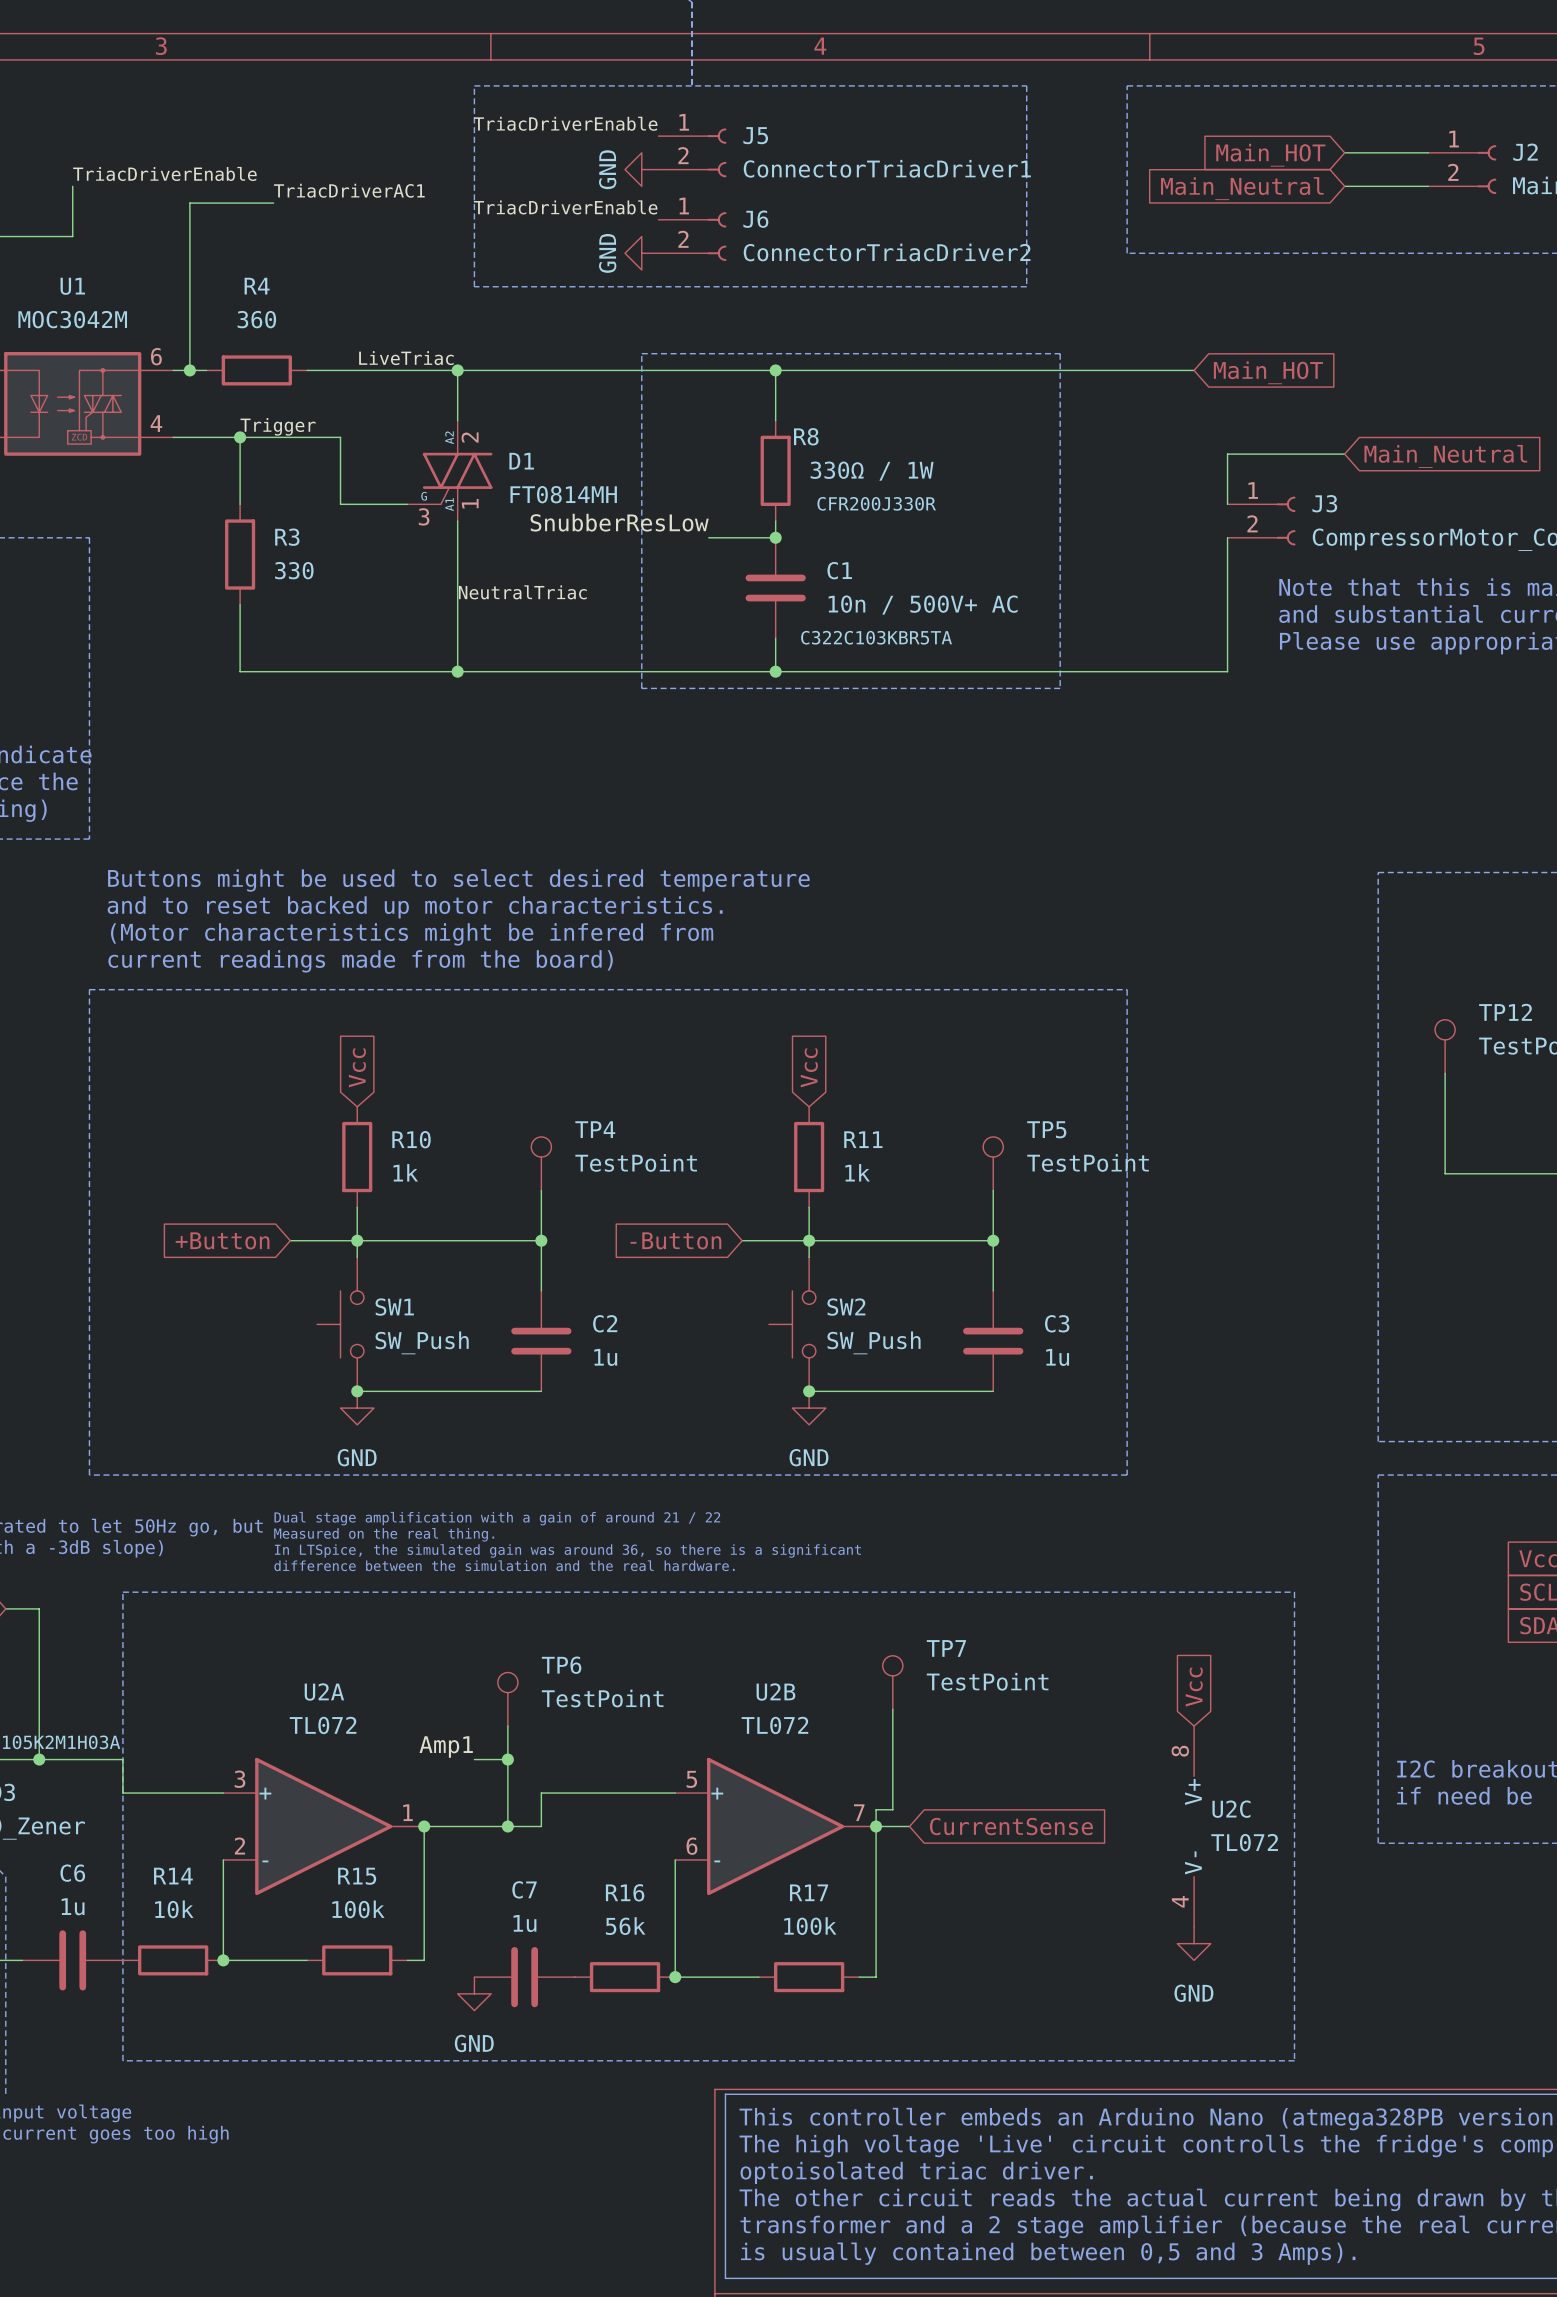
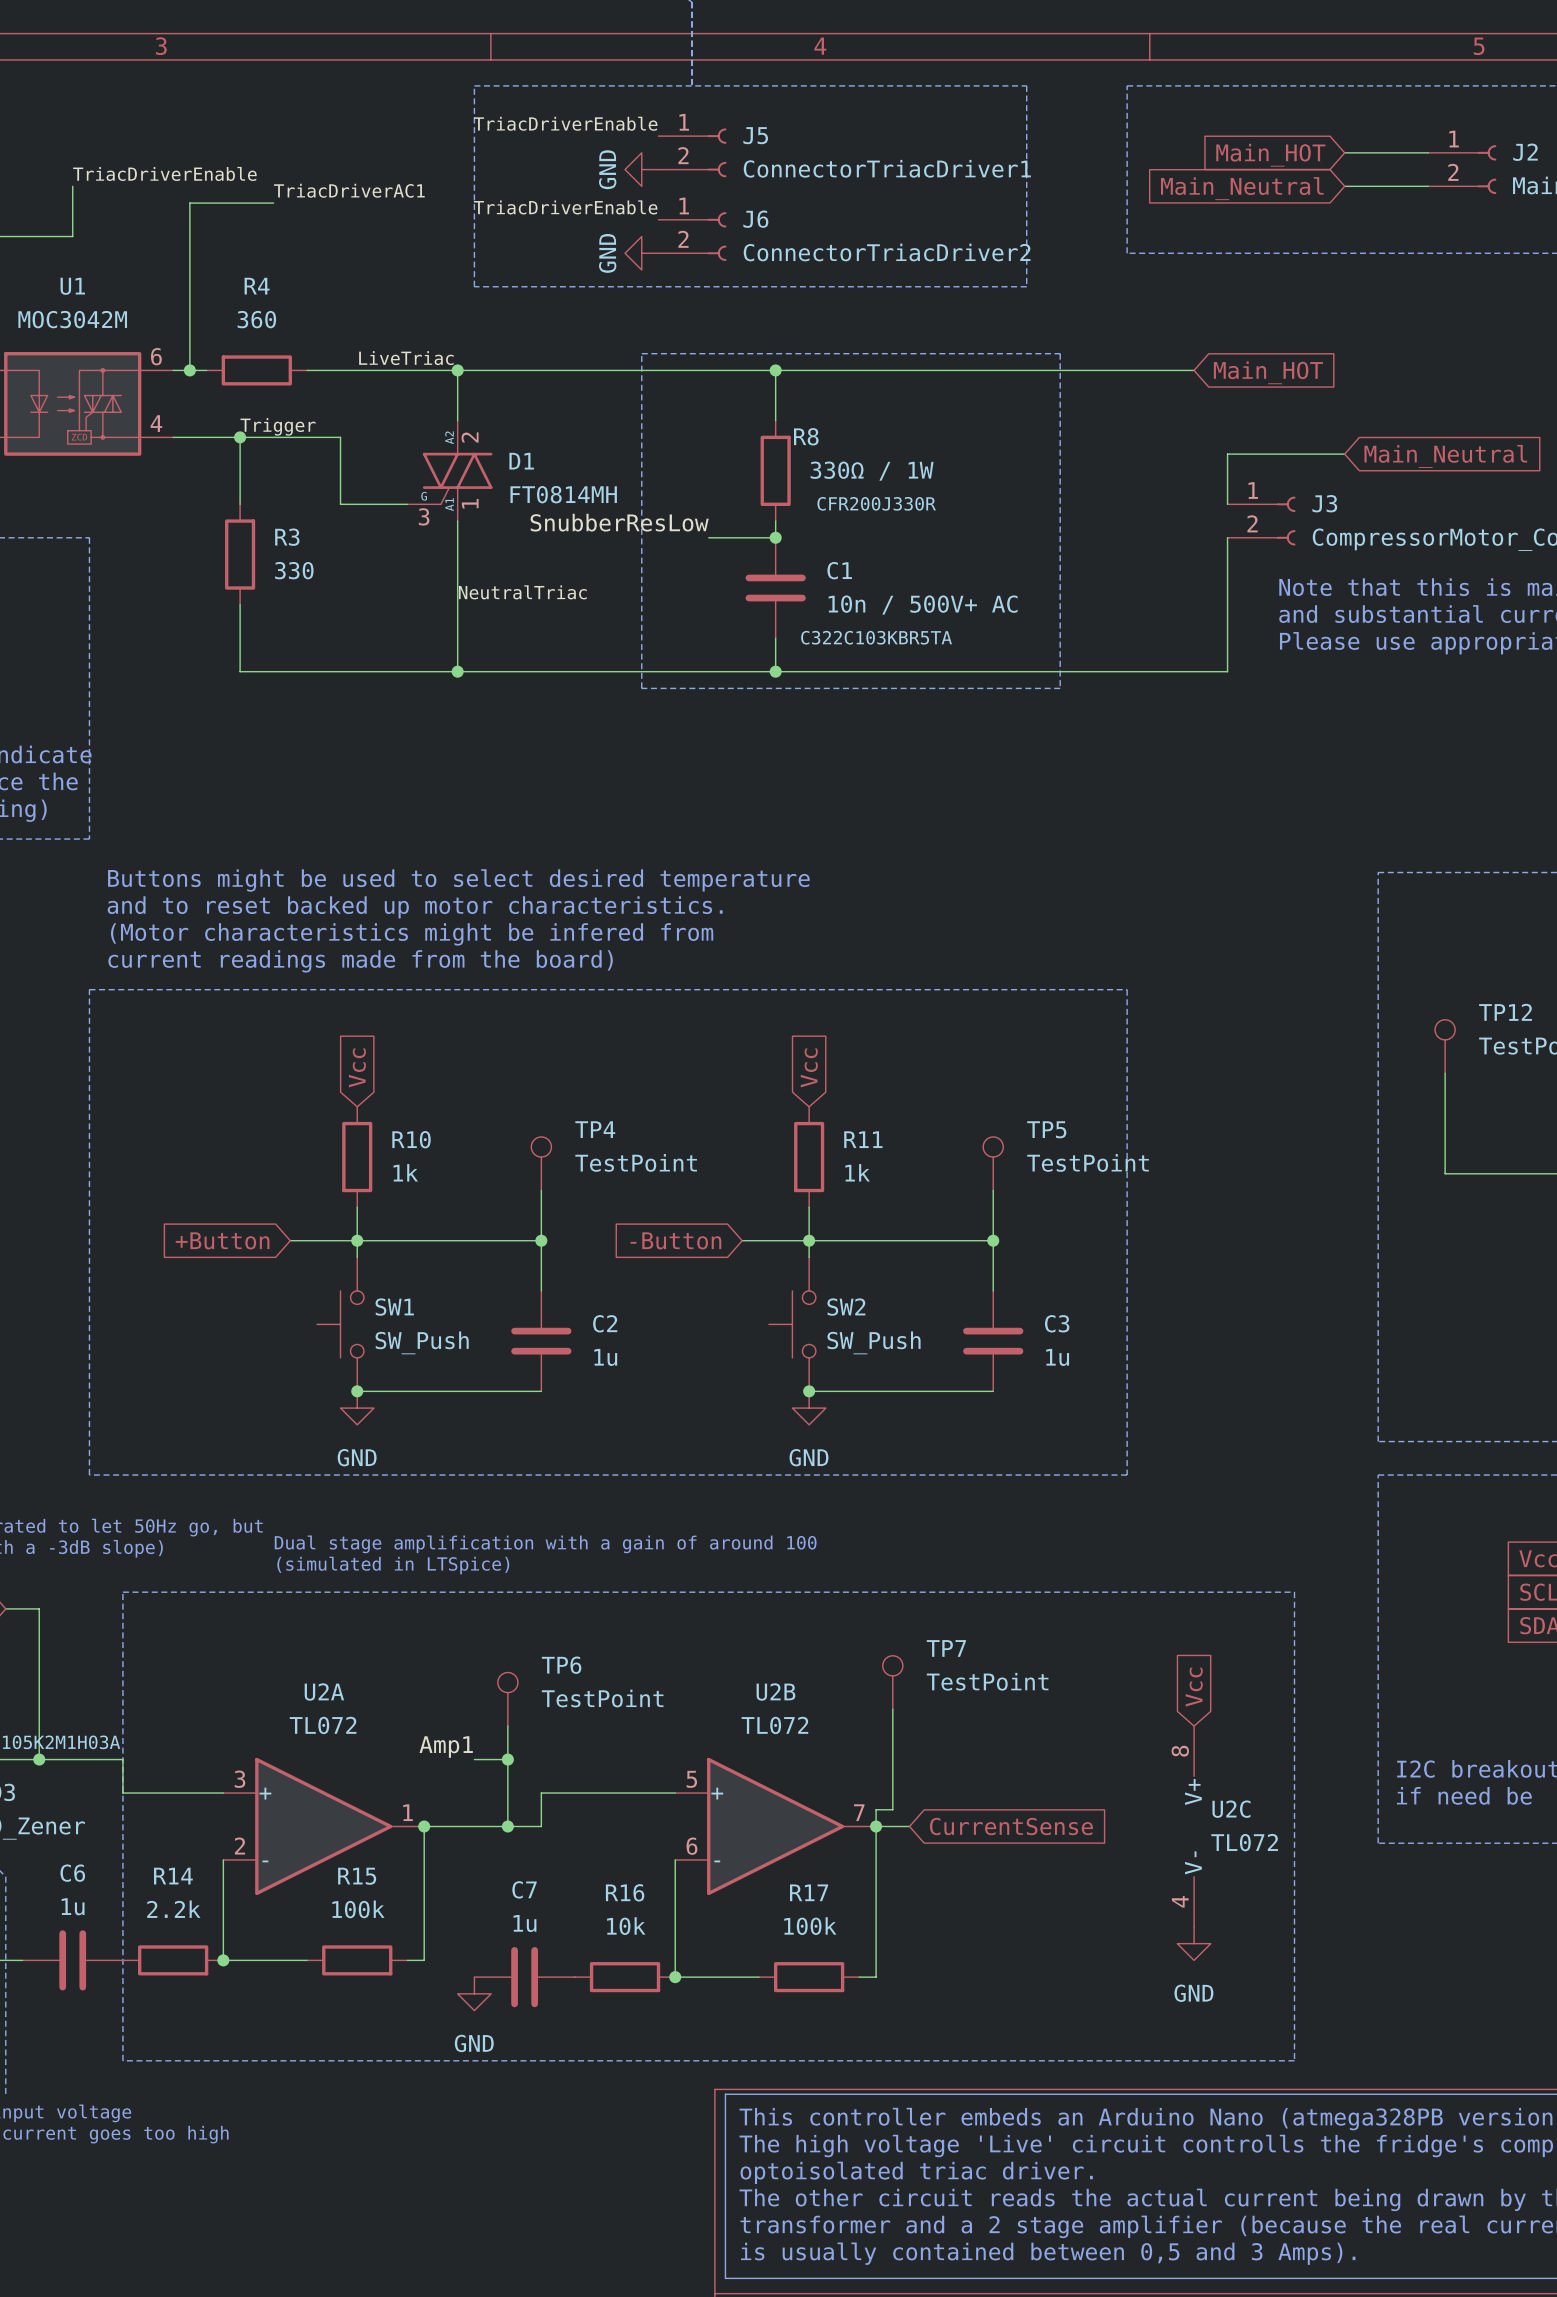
text: Dual stage amplification with a gain of around 21 / 22 (497, 1518) -> none
text: Measured on the real thing. (384, 1534) -> none
text: In LTSpice, the simulated gain was around 36, so there is a significant (567, 1550) -> Dual stage amplification with a gain of around 100 (545, 1544)
text: difference between the simulation and the real hardware. (504, 1565) -> (simulated in LTSpice) (393, 1565)
R14 value: 10k (174, 1909) -> 2.2k (173, 1909)
R16 value: 56k (625, 1926) -> 10k (626, 1926)

